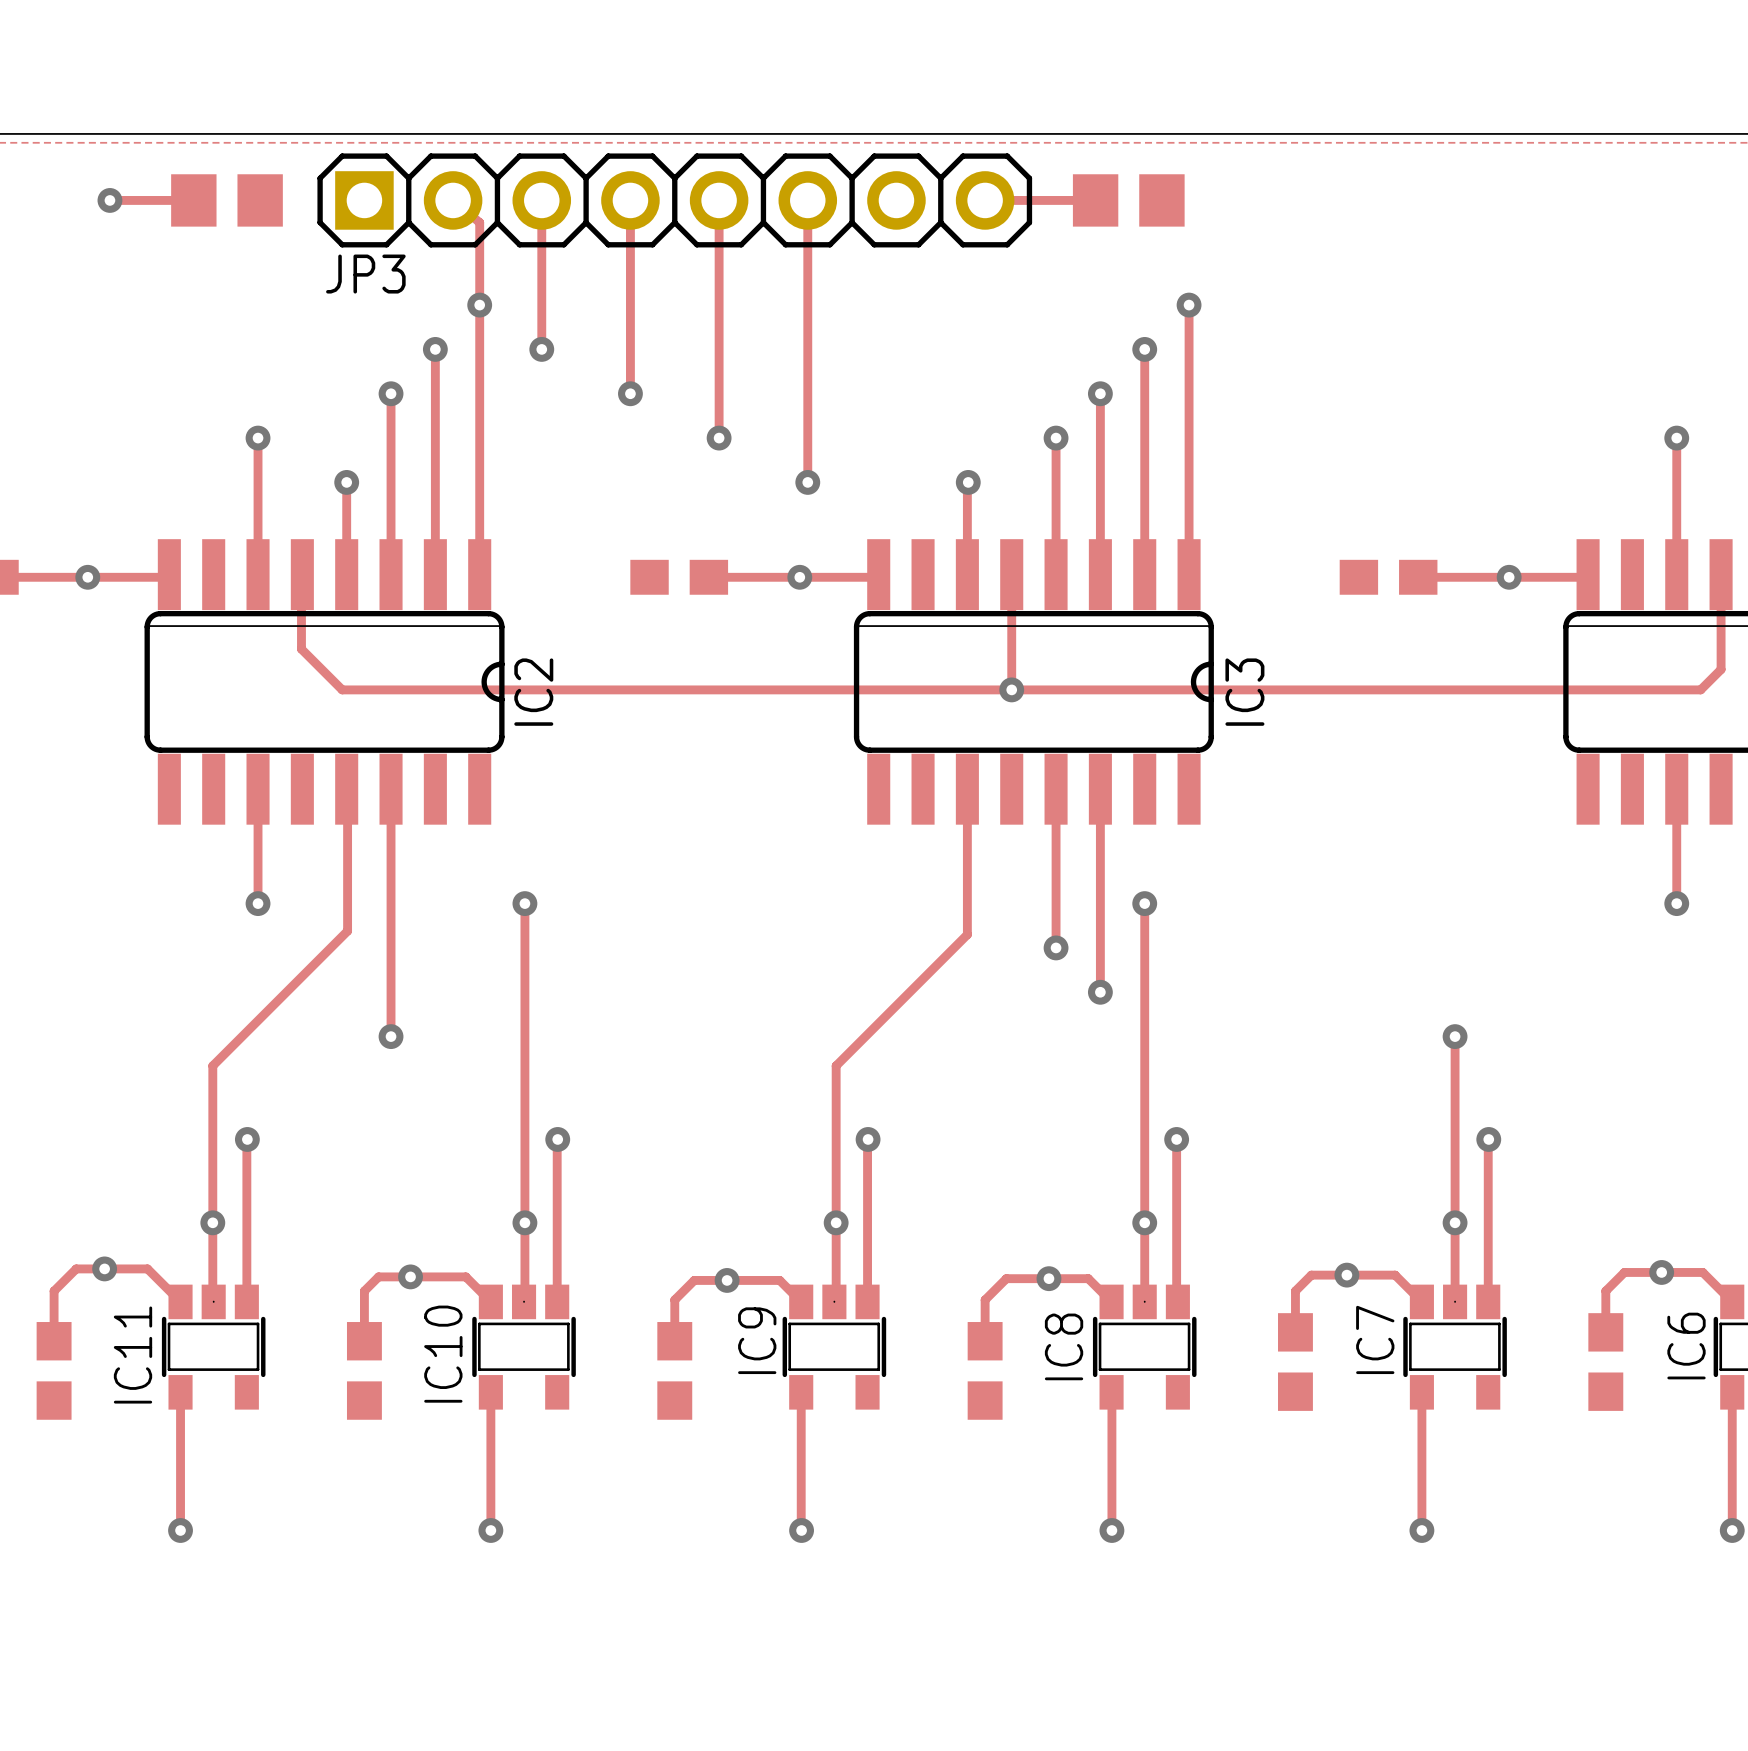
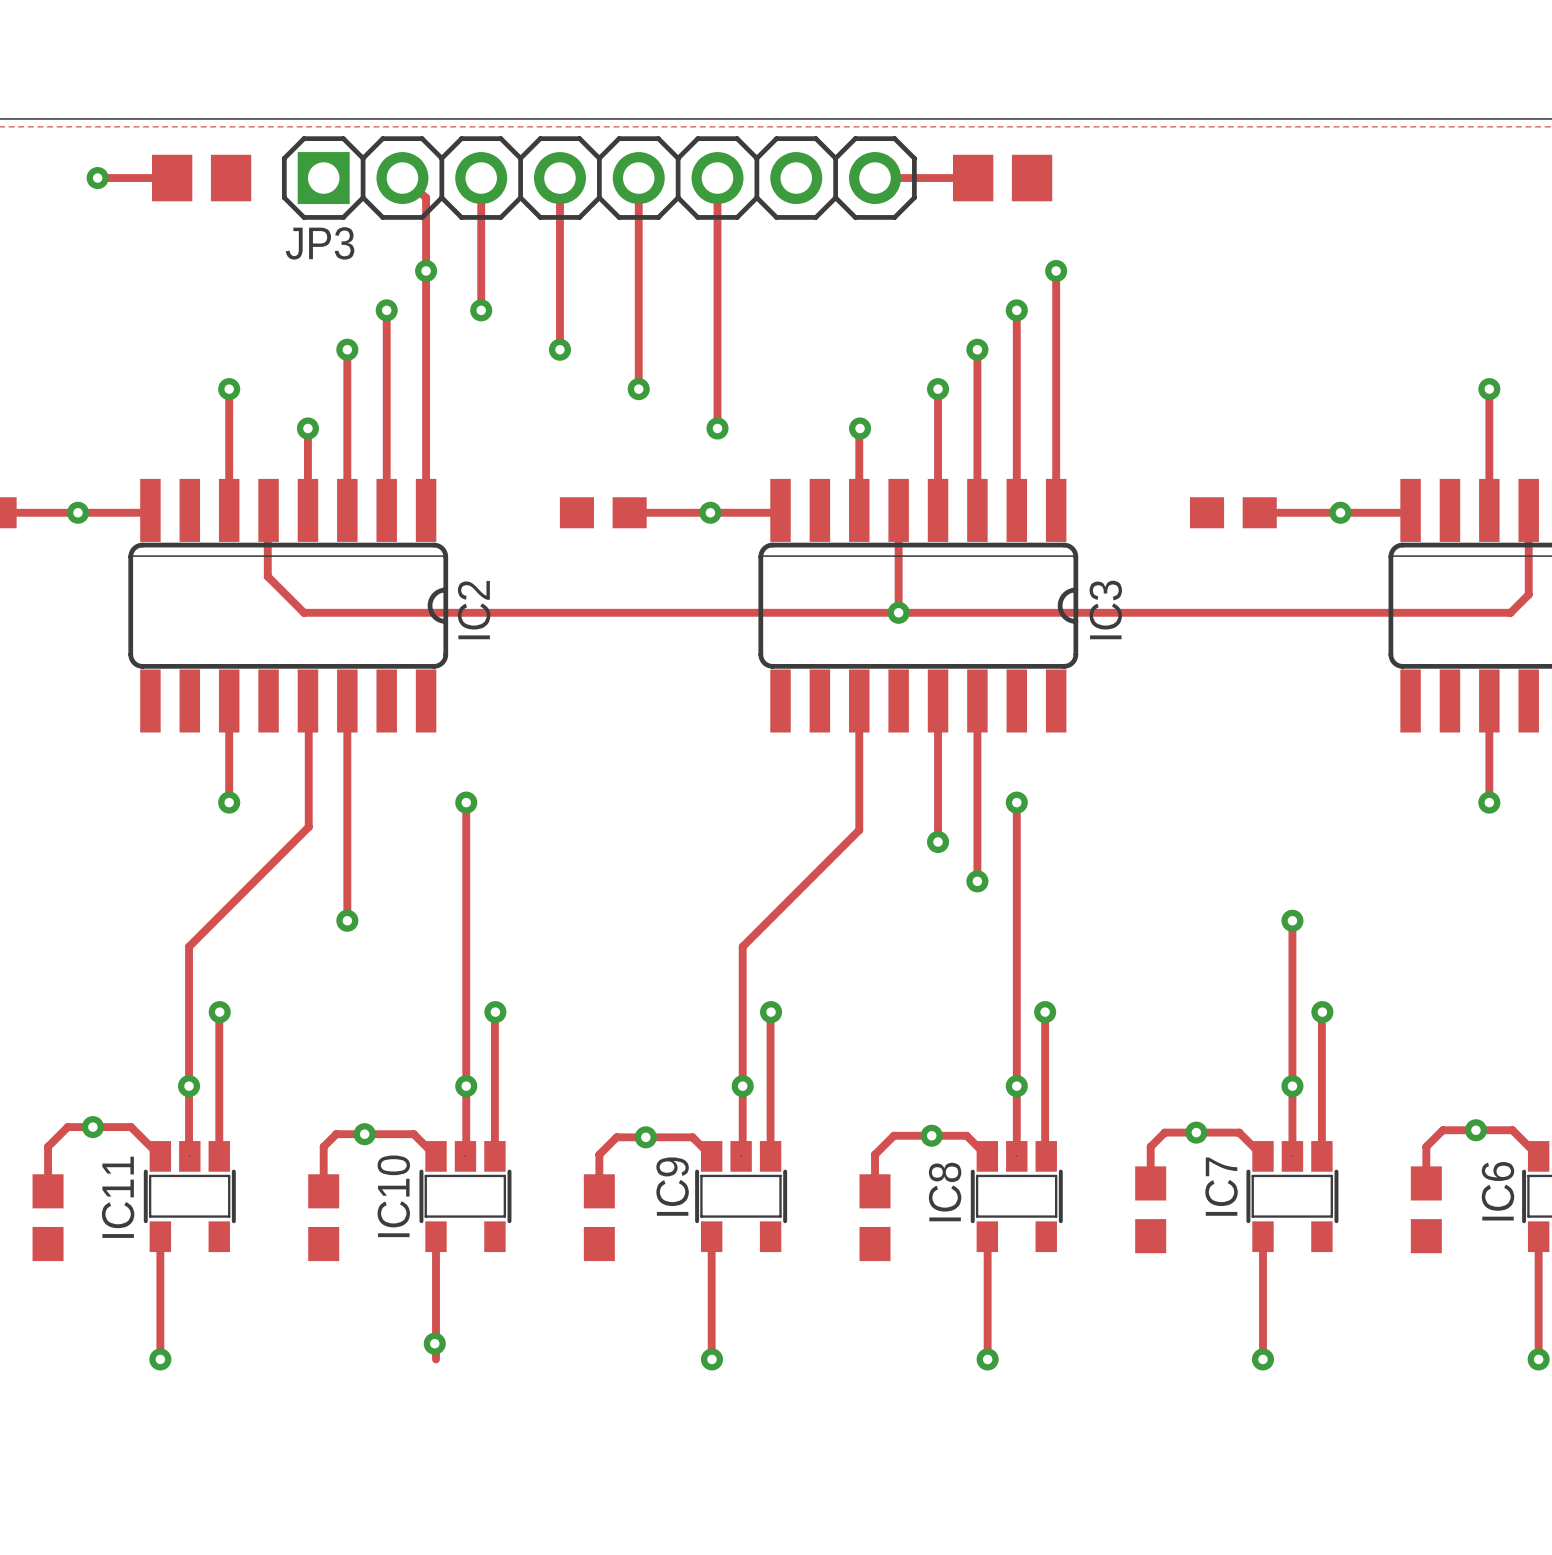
via position: (490, 1530) -> (434, 1343)

